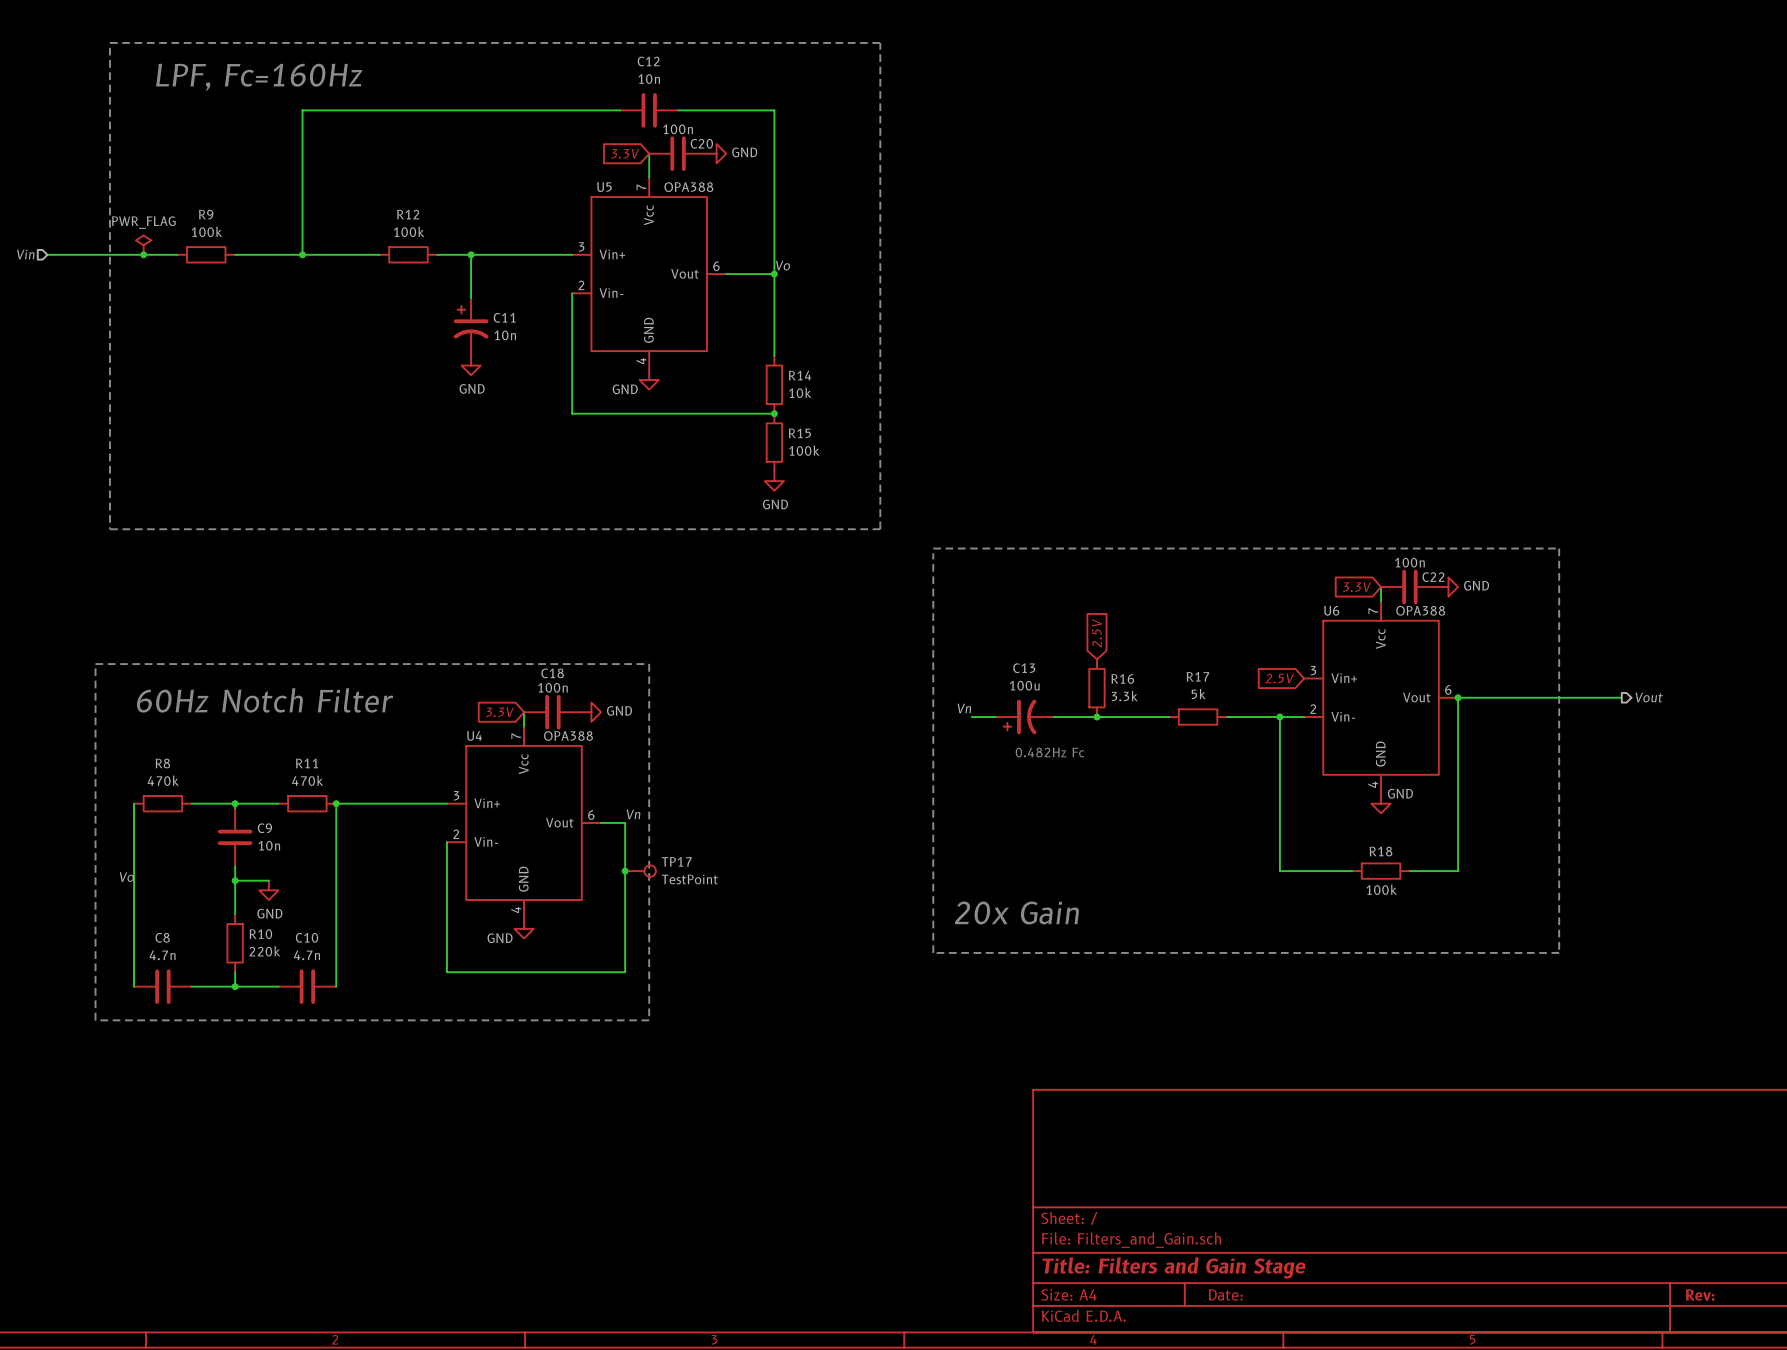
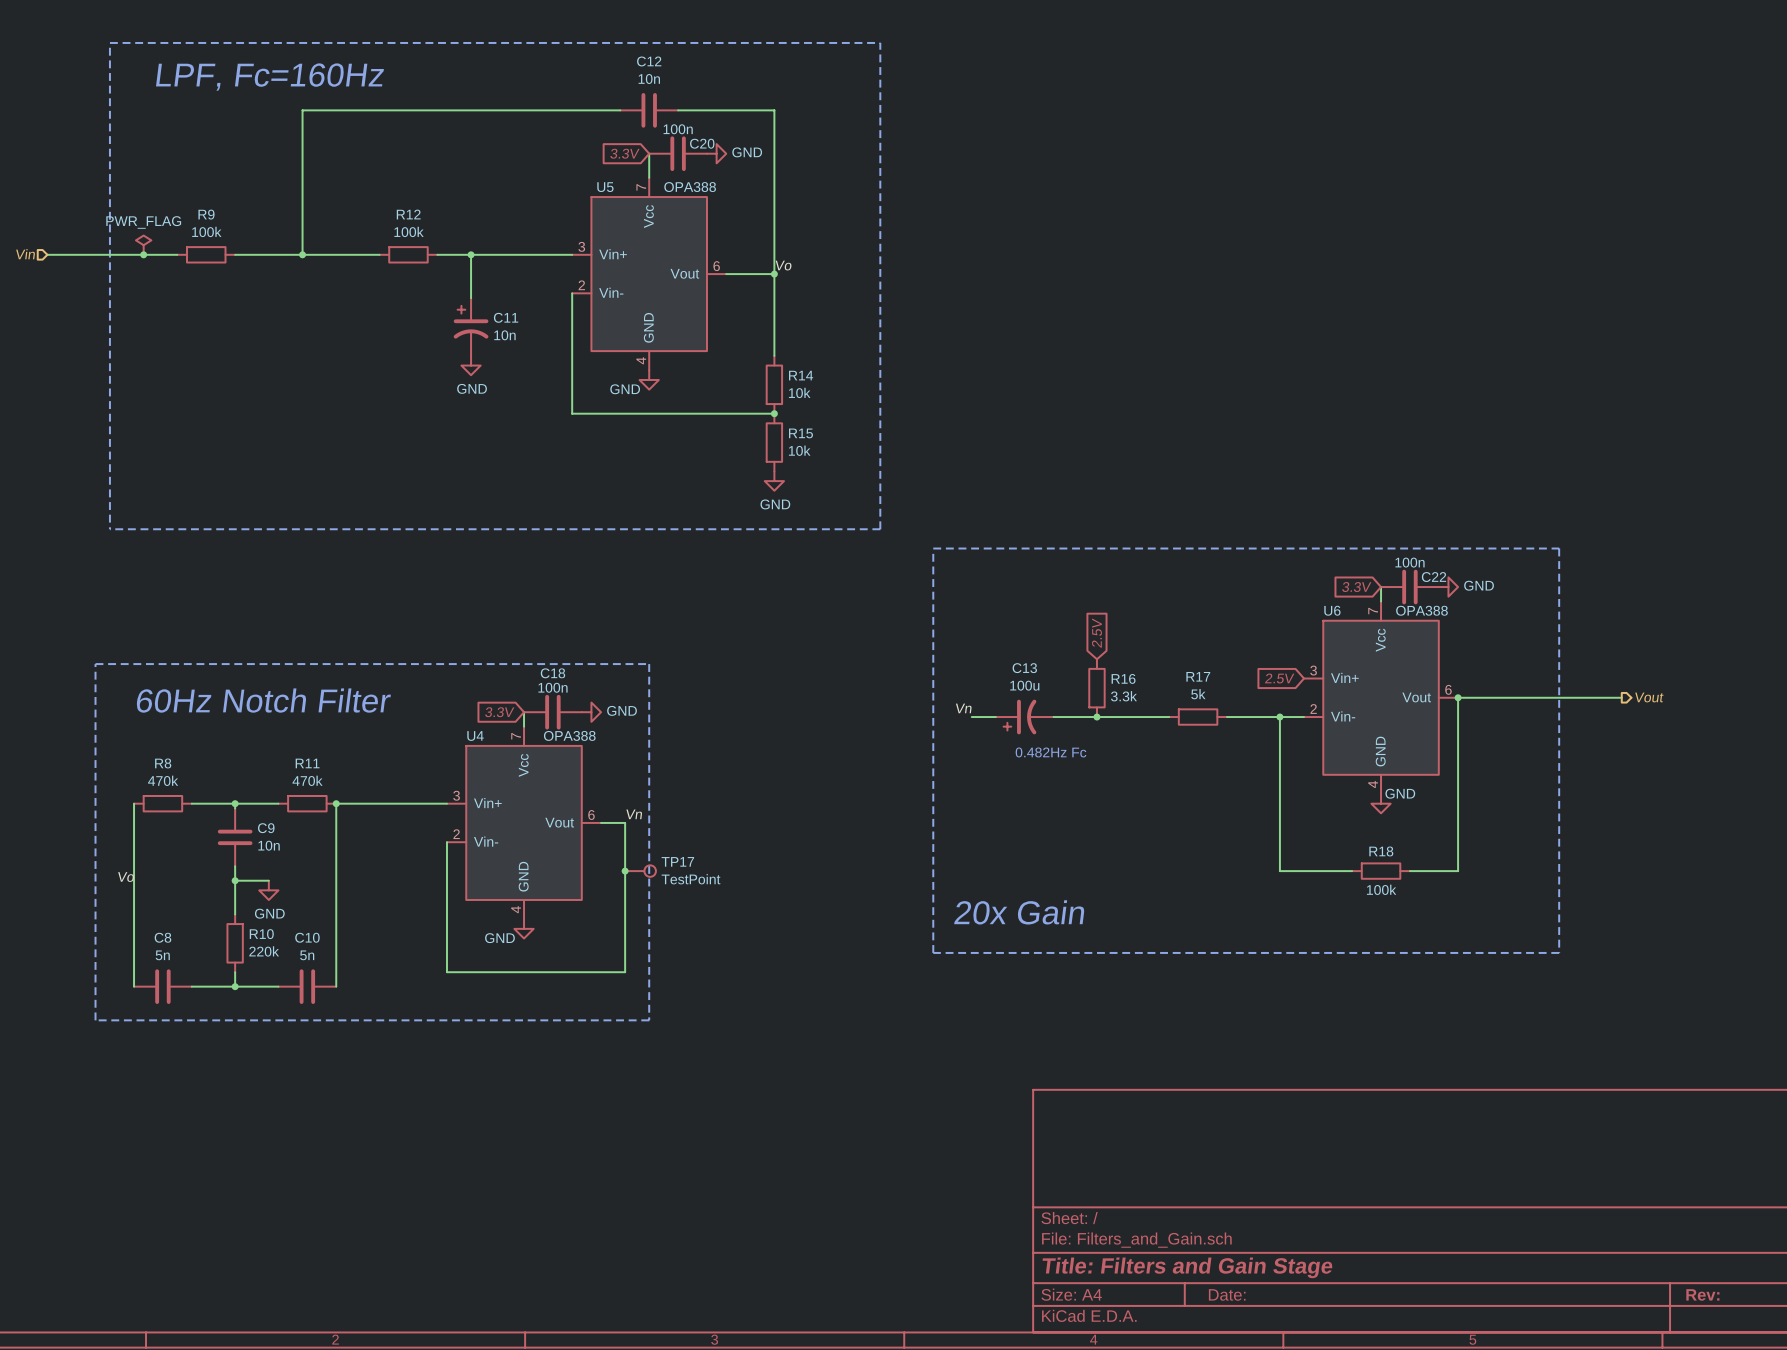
R15 value: 100k (804, 450) -> 10k (799, 450)
C8 value: 4.7n (162, 955) -> 5n (162, 955)
C10 value: 4.7n (307, 955) -> 5n (307, 955)

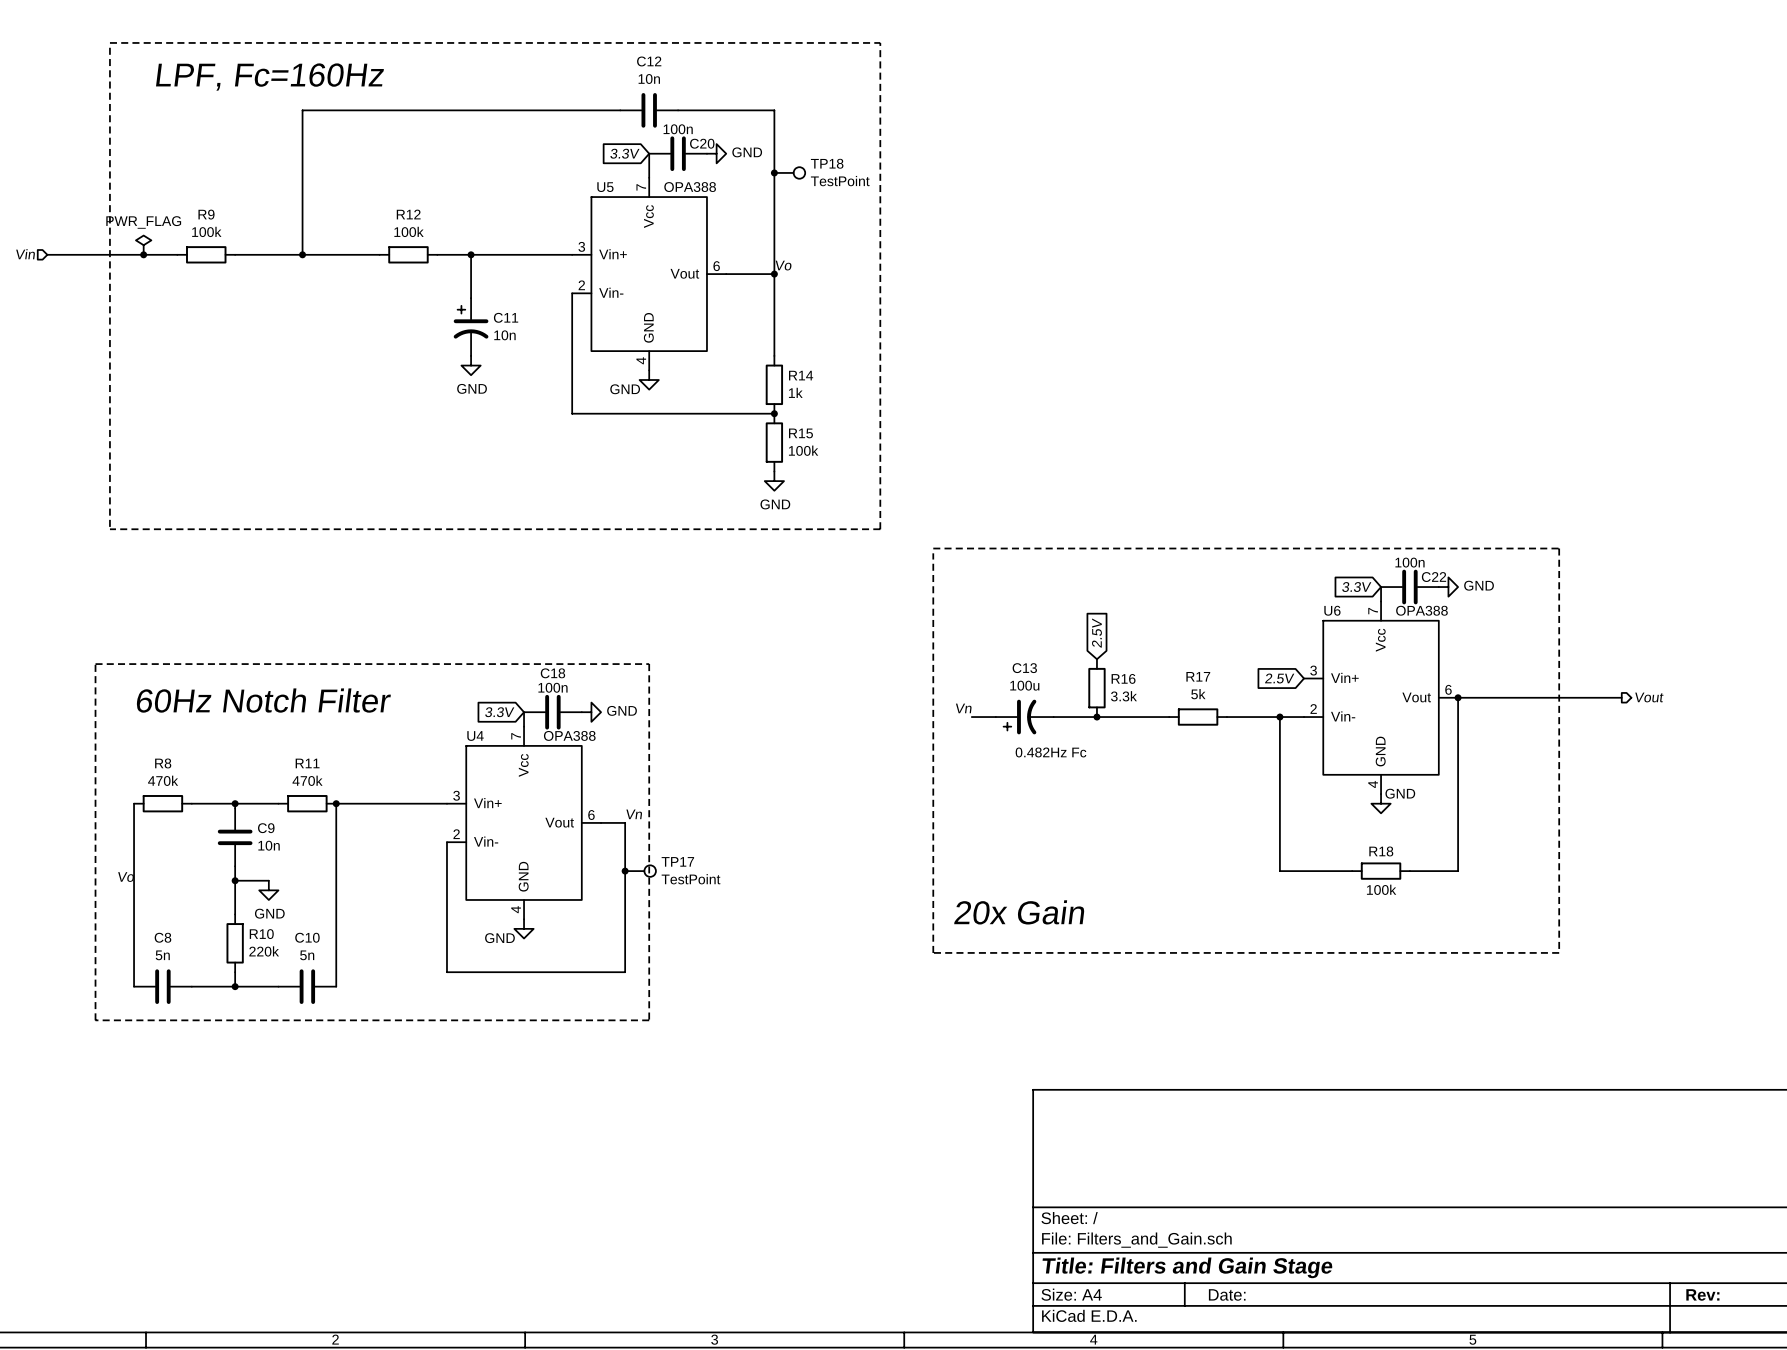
junction: none -> (774, 172)
TP18: none -> TestPoint (789, 172)
R14 value: 10k (799, 392) -> 1k (795, 392)
R15 value: 10k (799, 450) -> 100k (803, 450)

